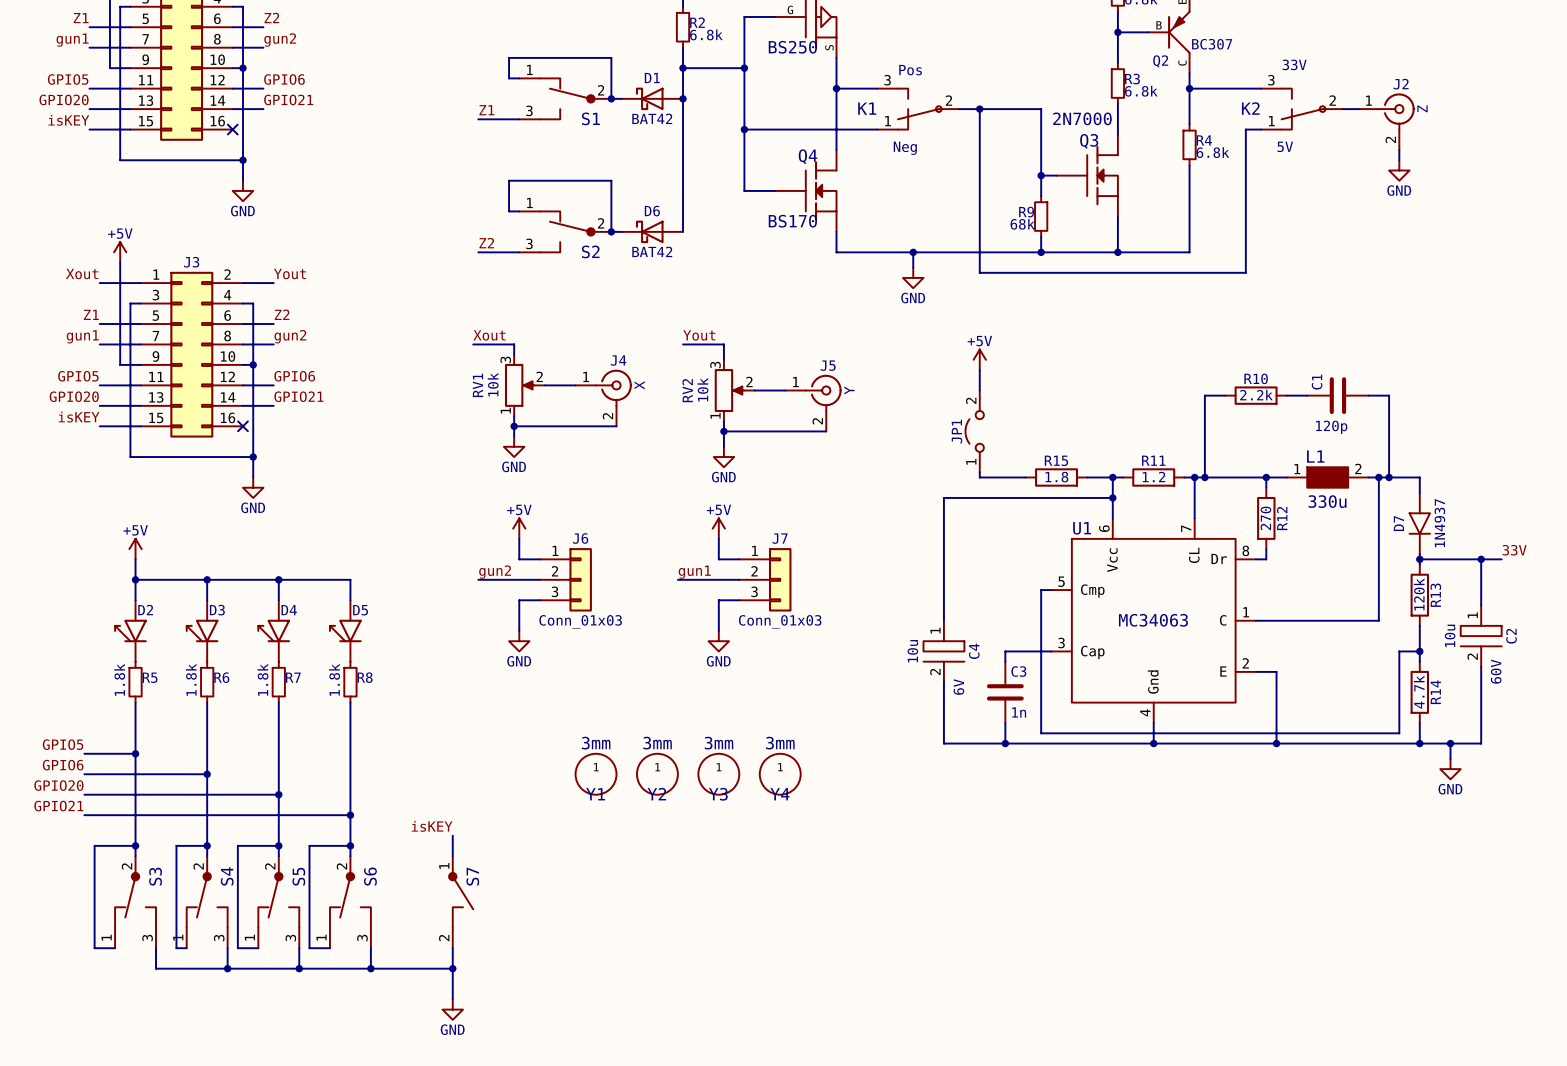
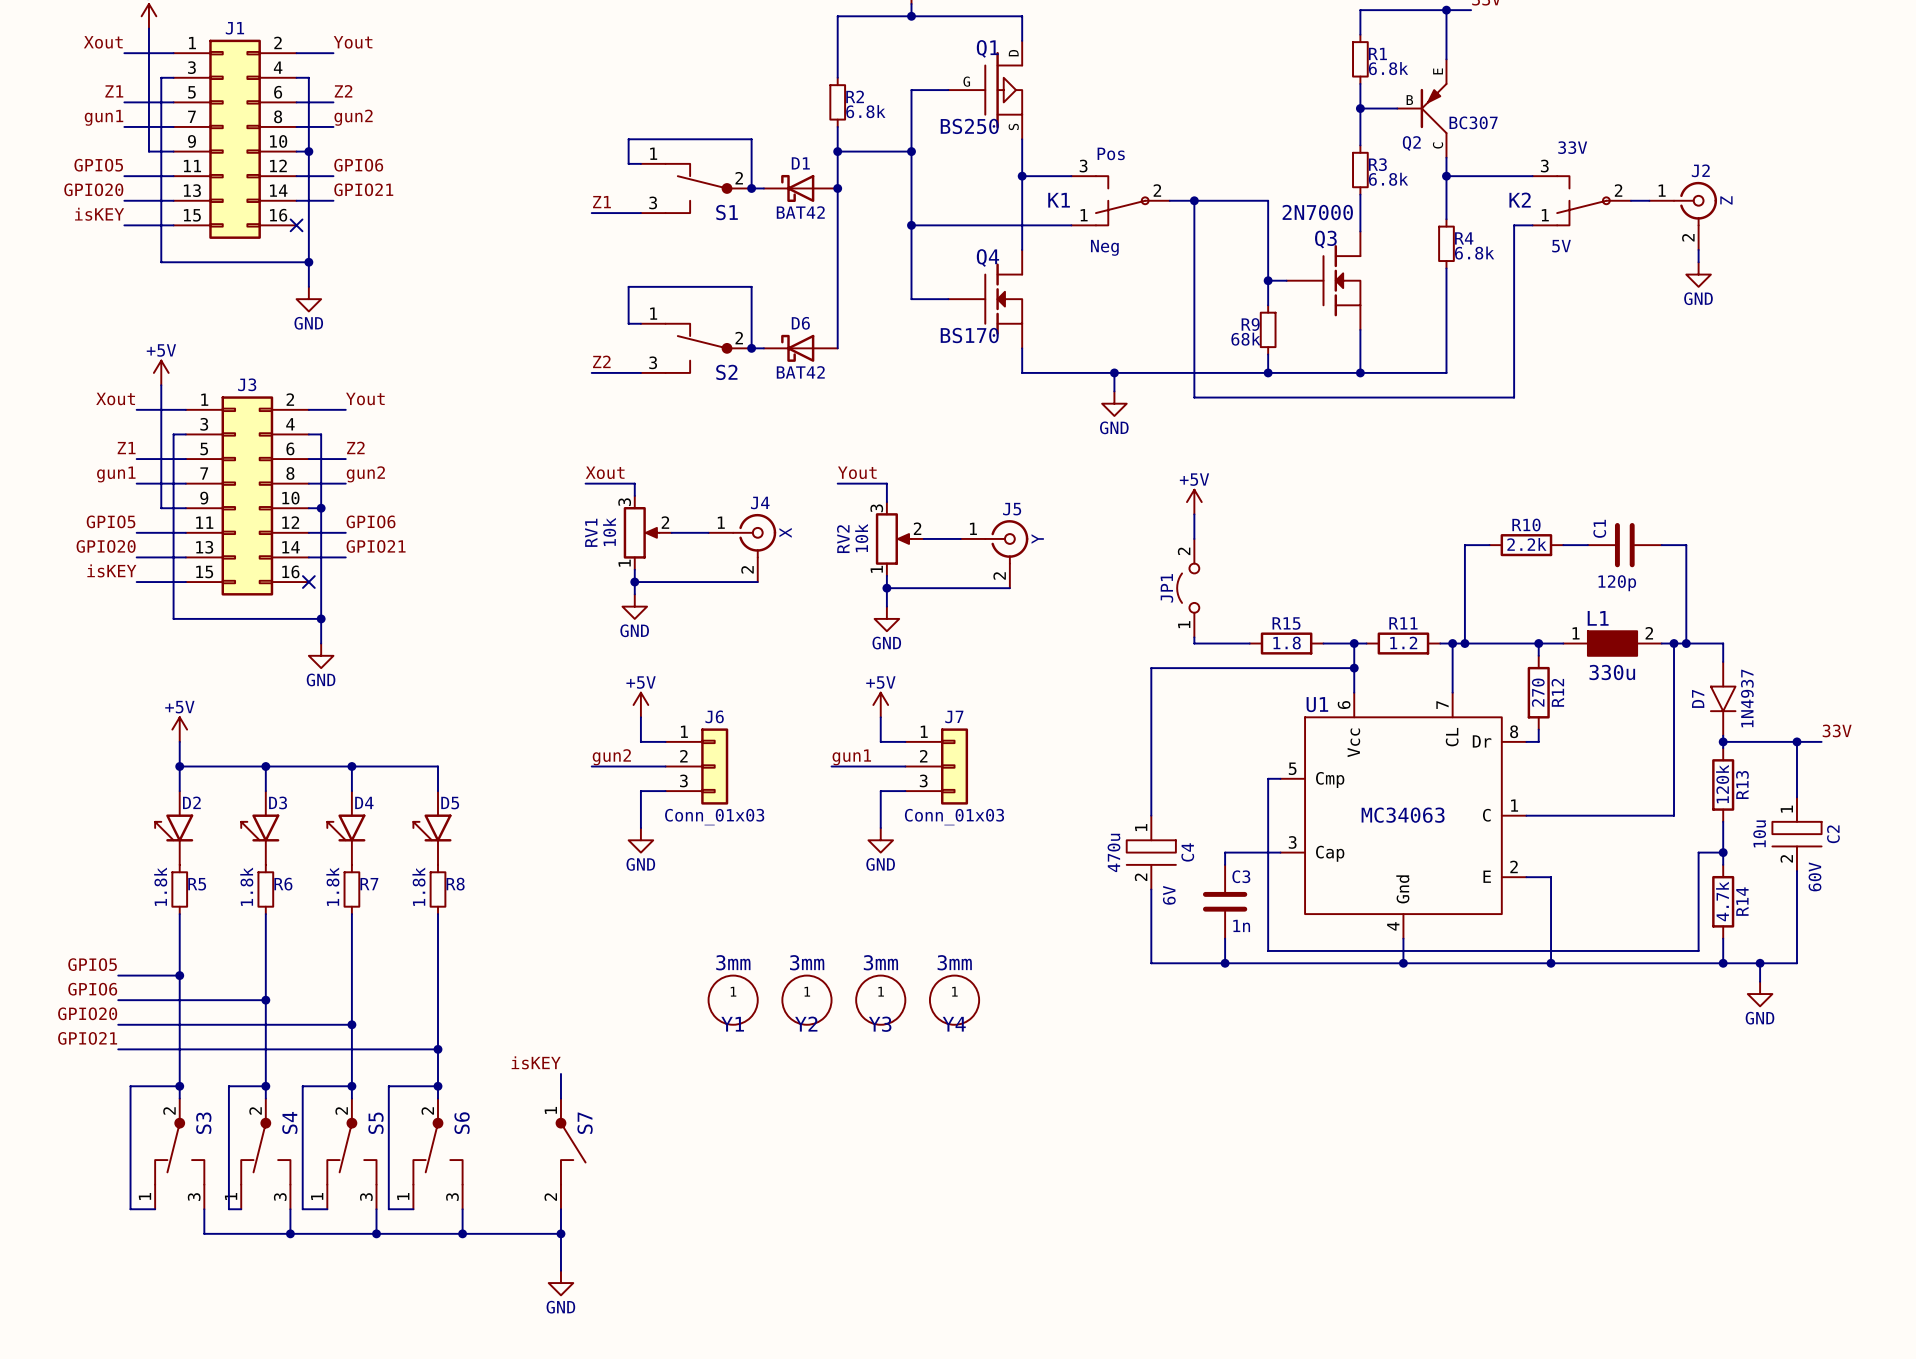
C4 value: 10u (912, 651) -> 470u (1113, 852)

